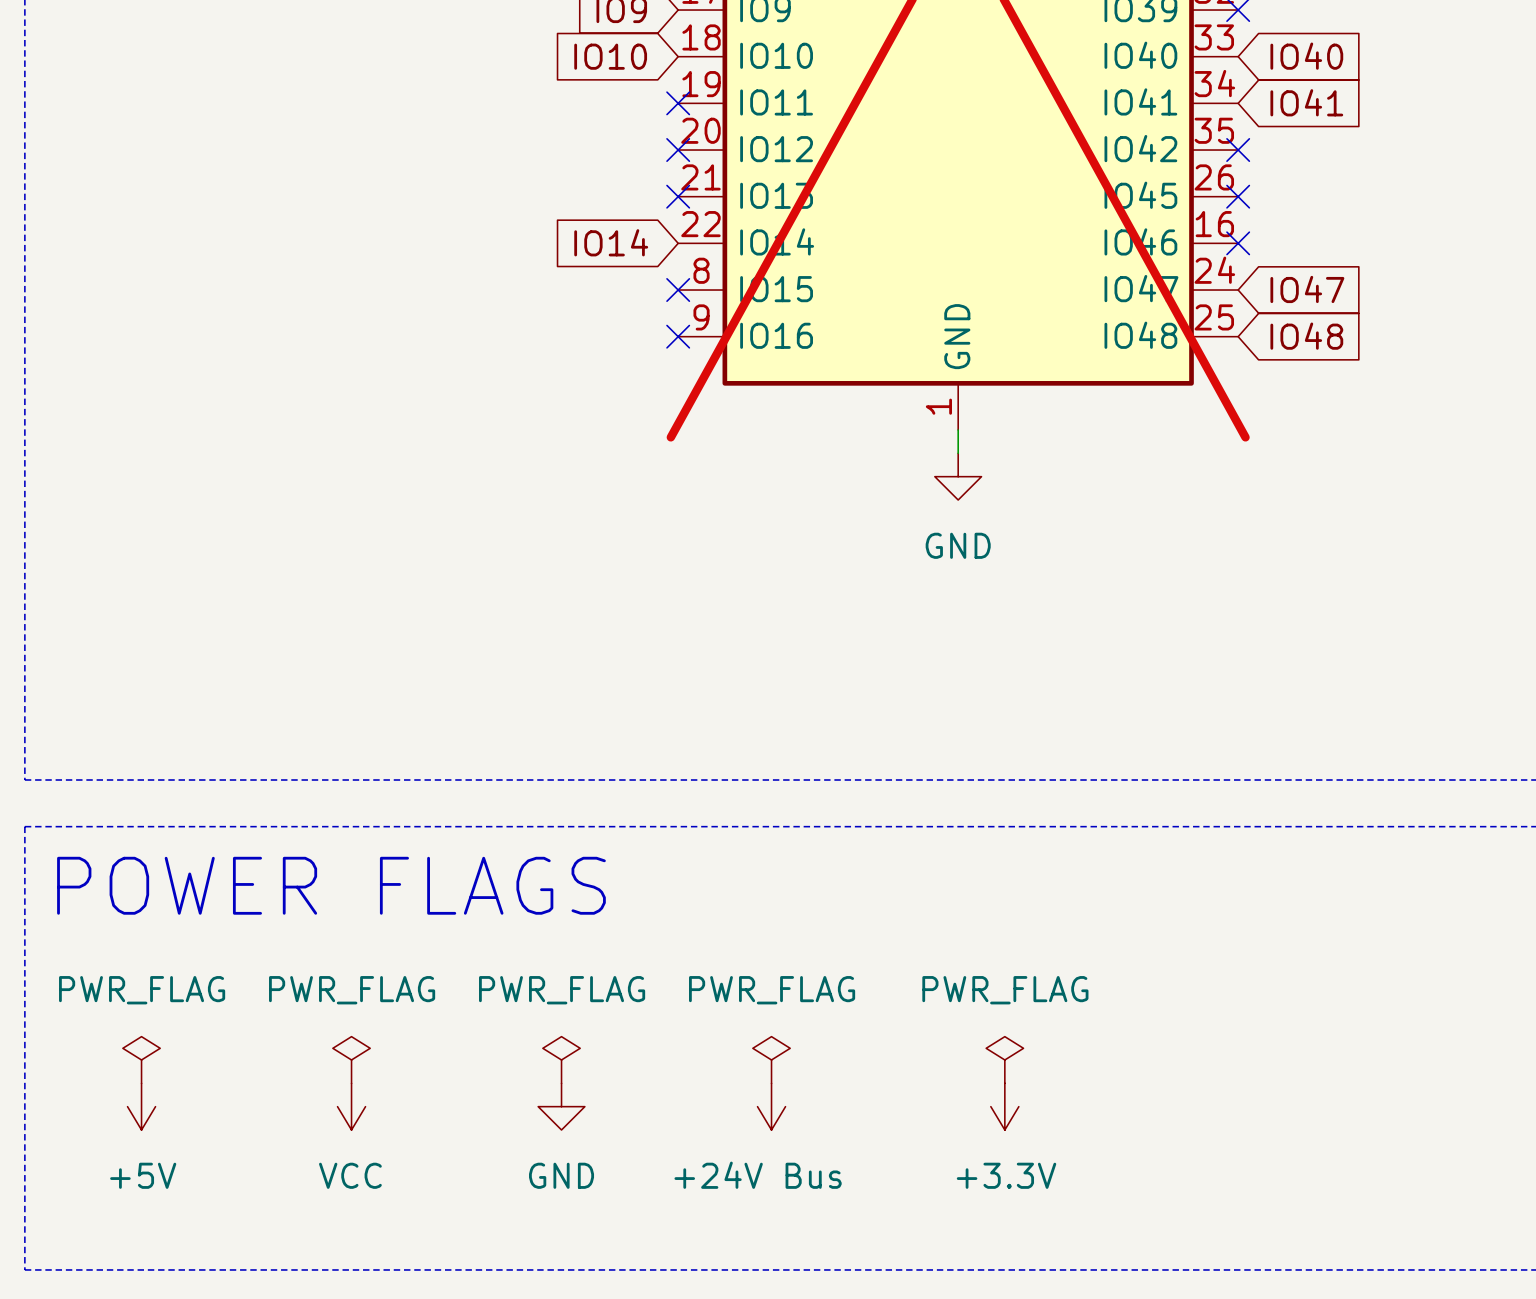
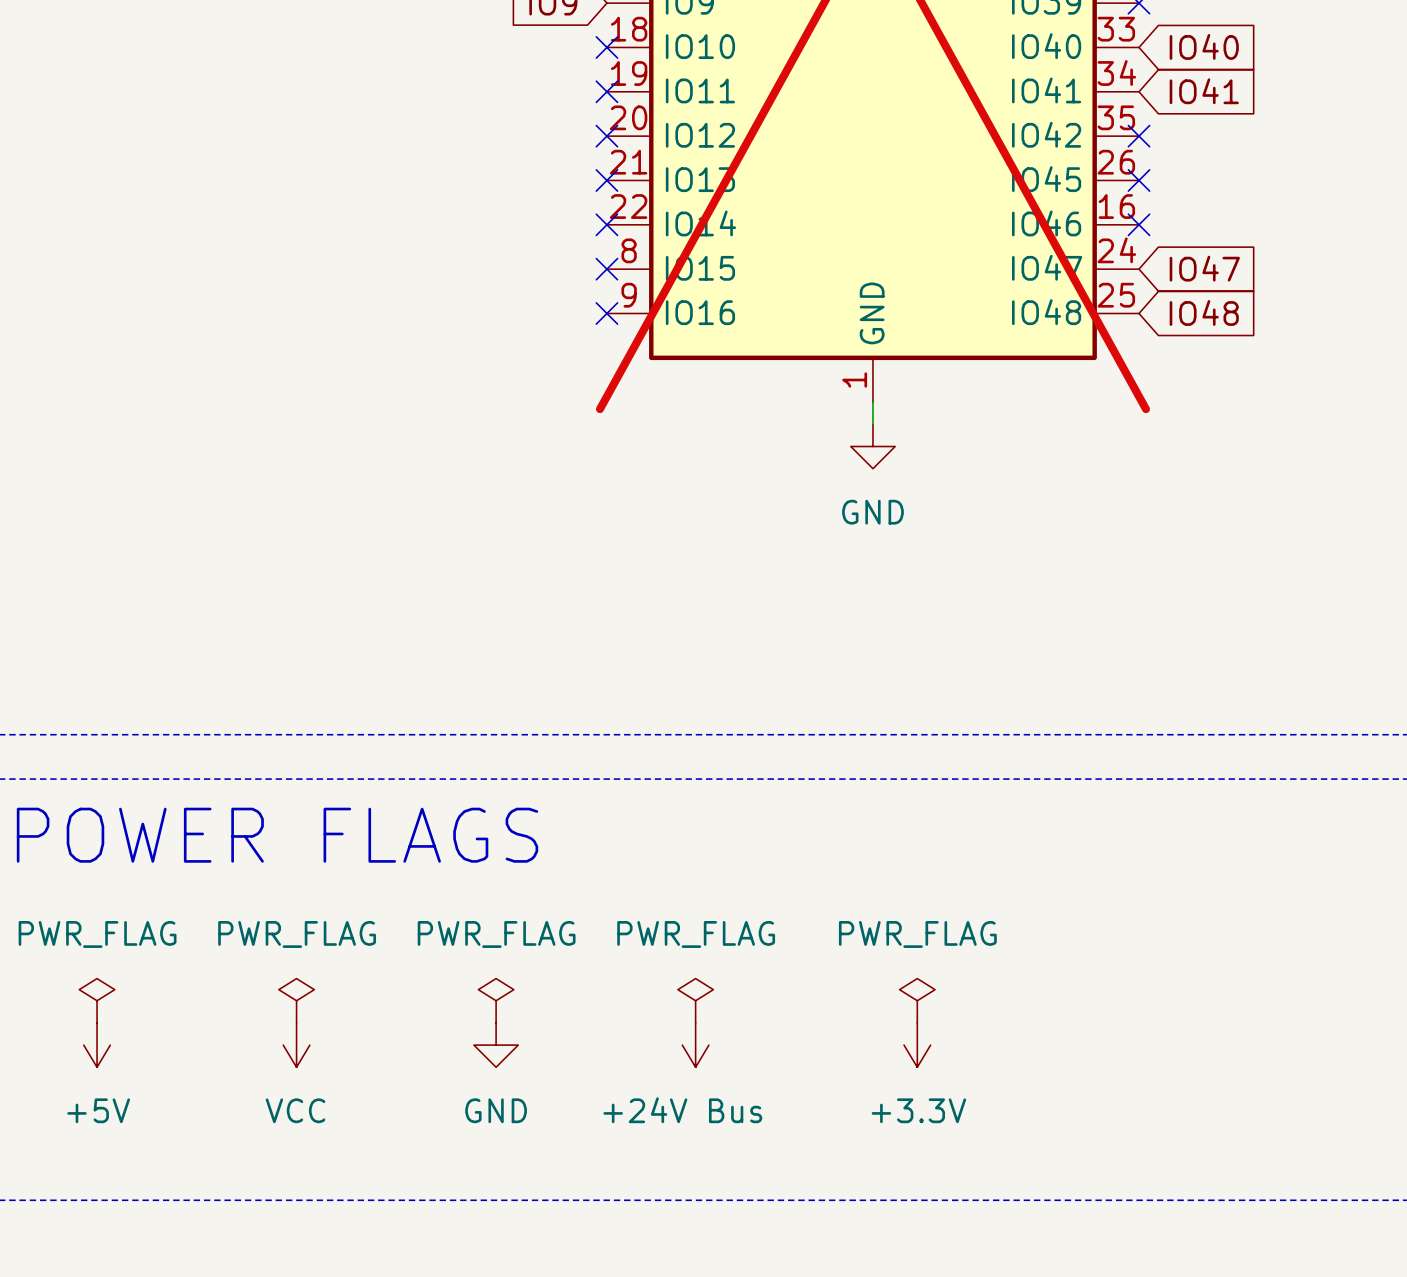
global label: IO10 (610, 56) -> none
no-connect mark: none -> (606, 47)
global label: IO14 (611, 242) -> none
no-connect mark: none -> (606, 224)

